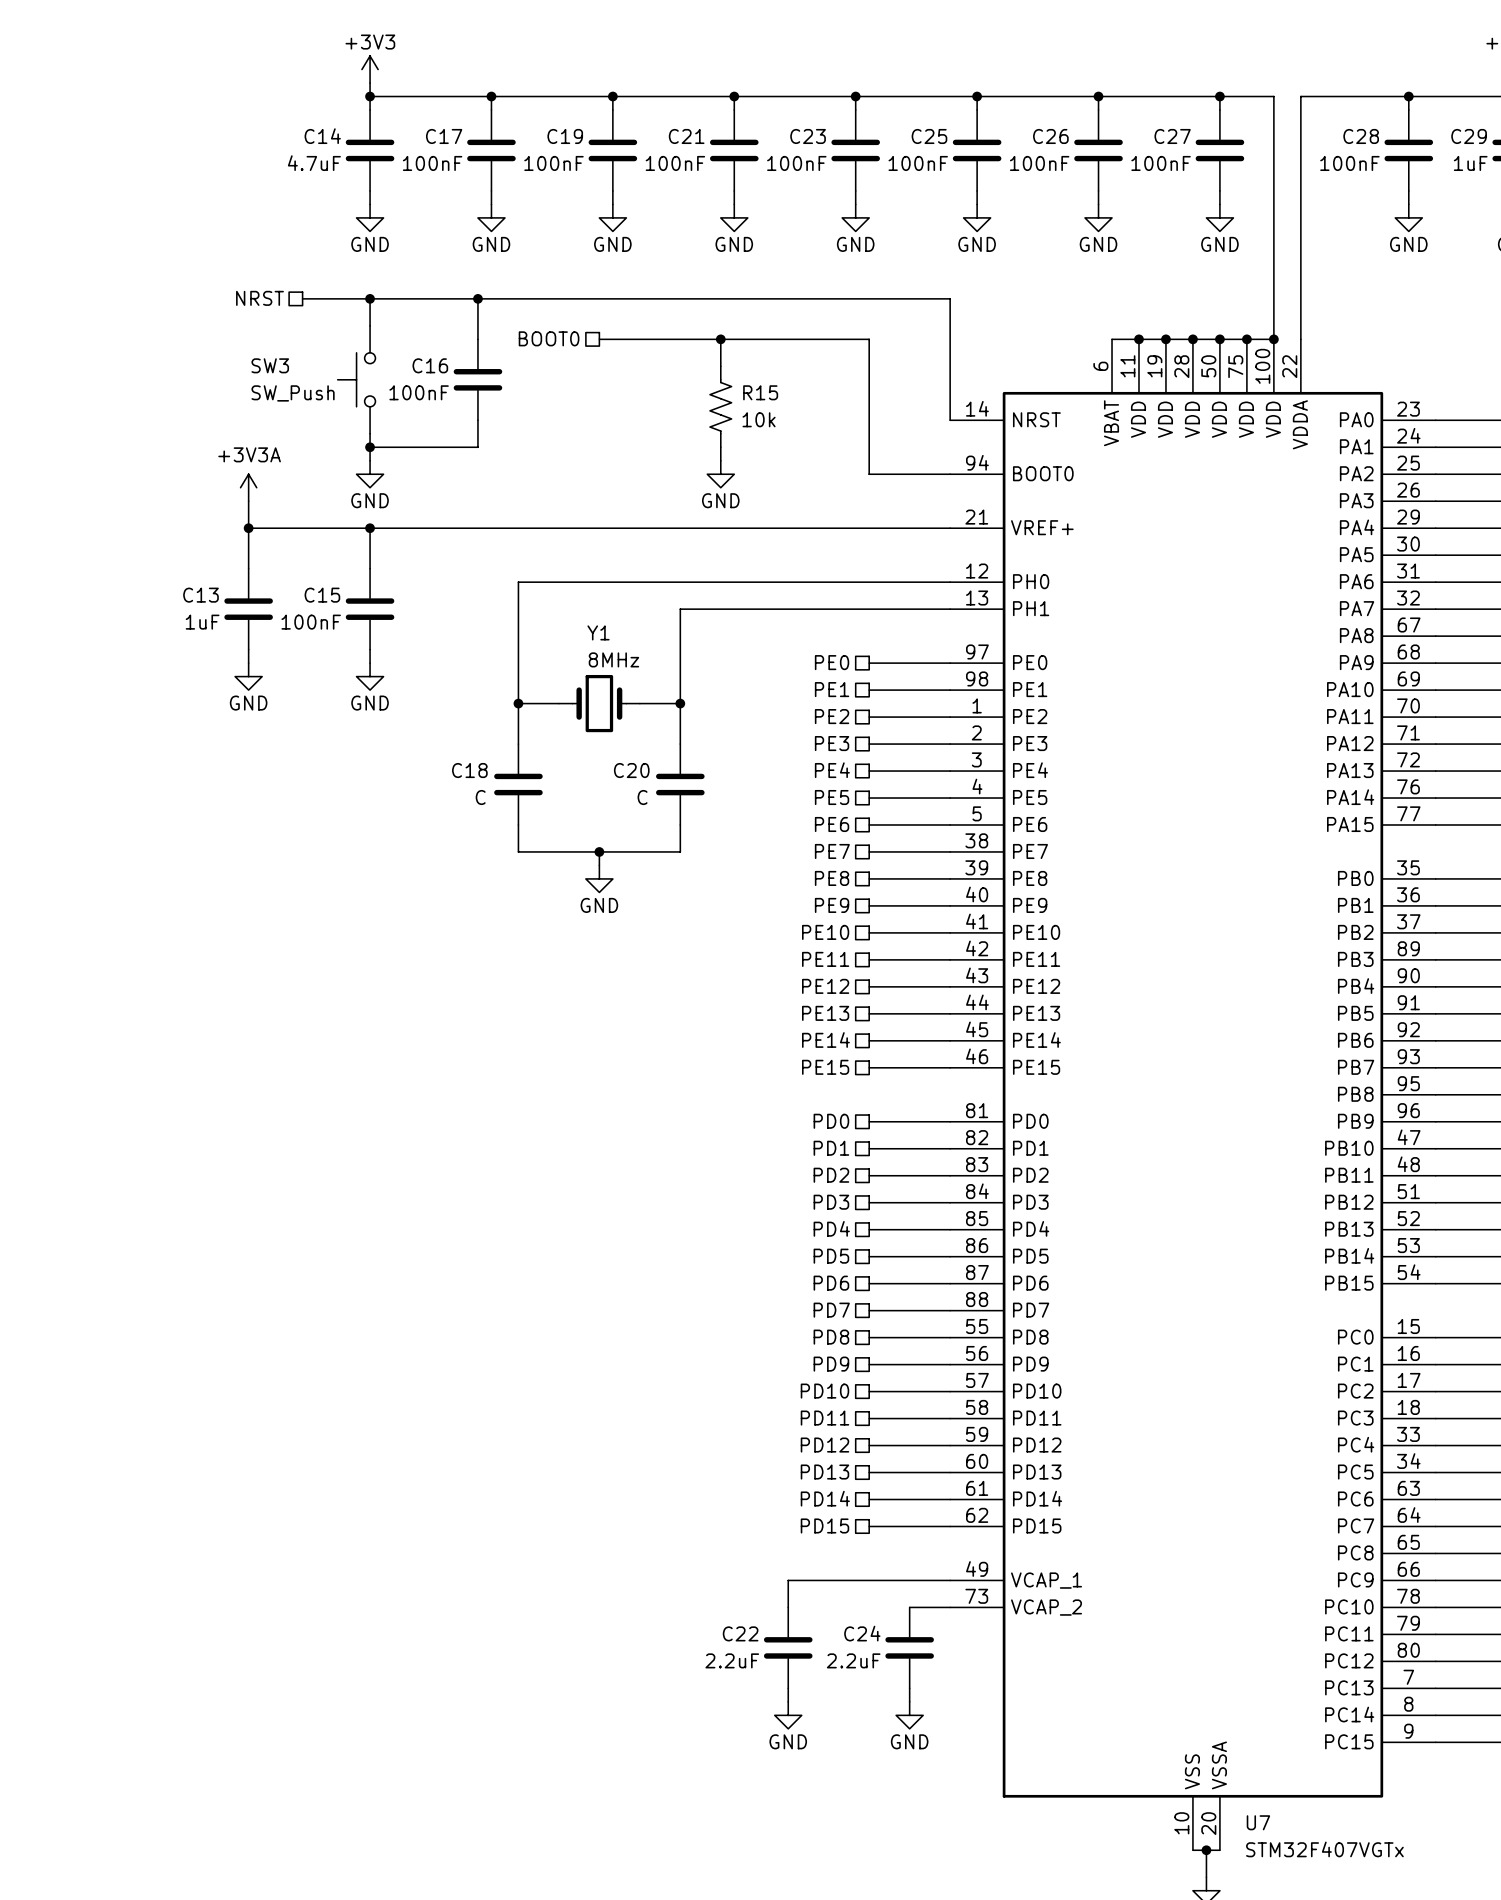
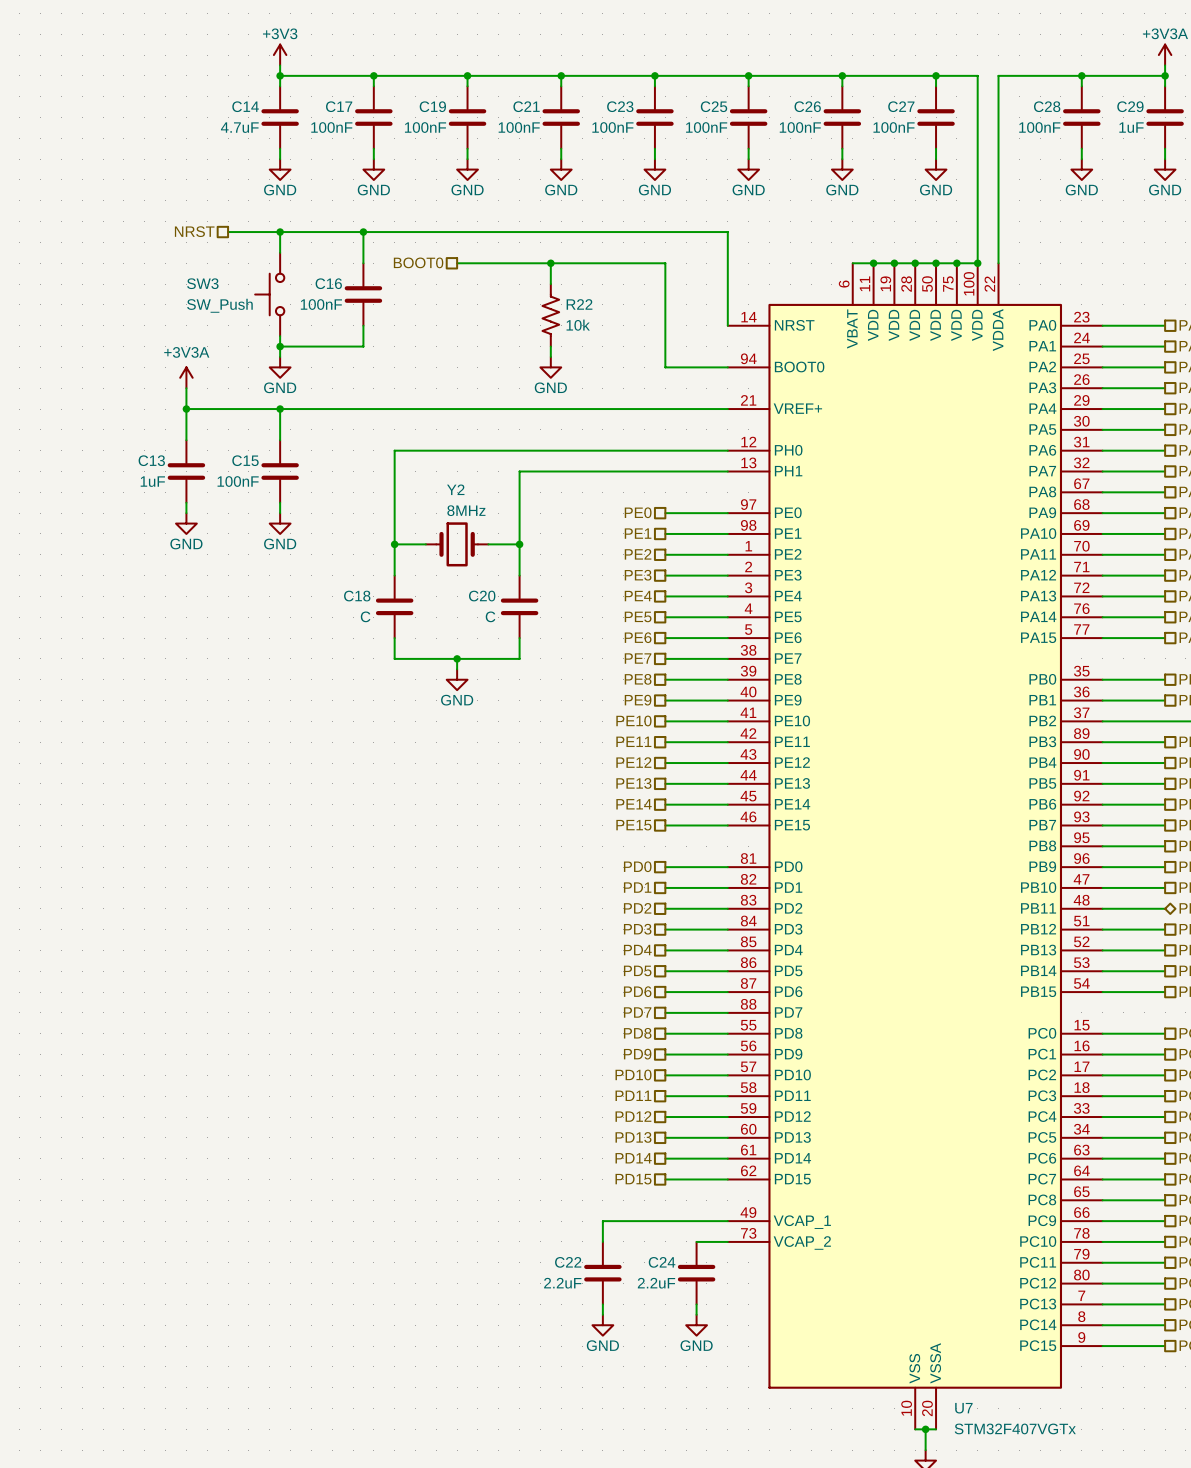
R15 name: R15 (760, 392) -> R22 (579, 304)
Y1 name: Y1 (598, 632) -> Y2 (455, 489)

